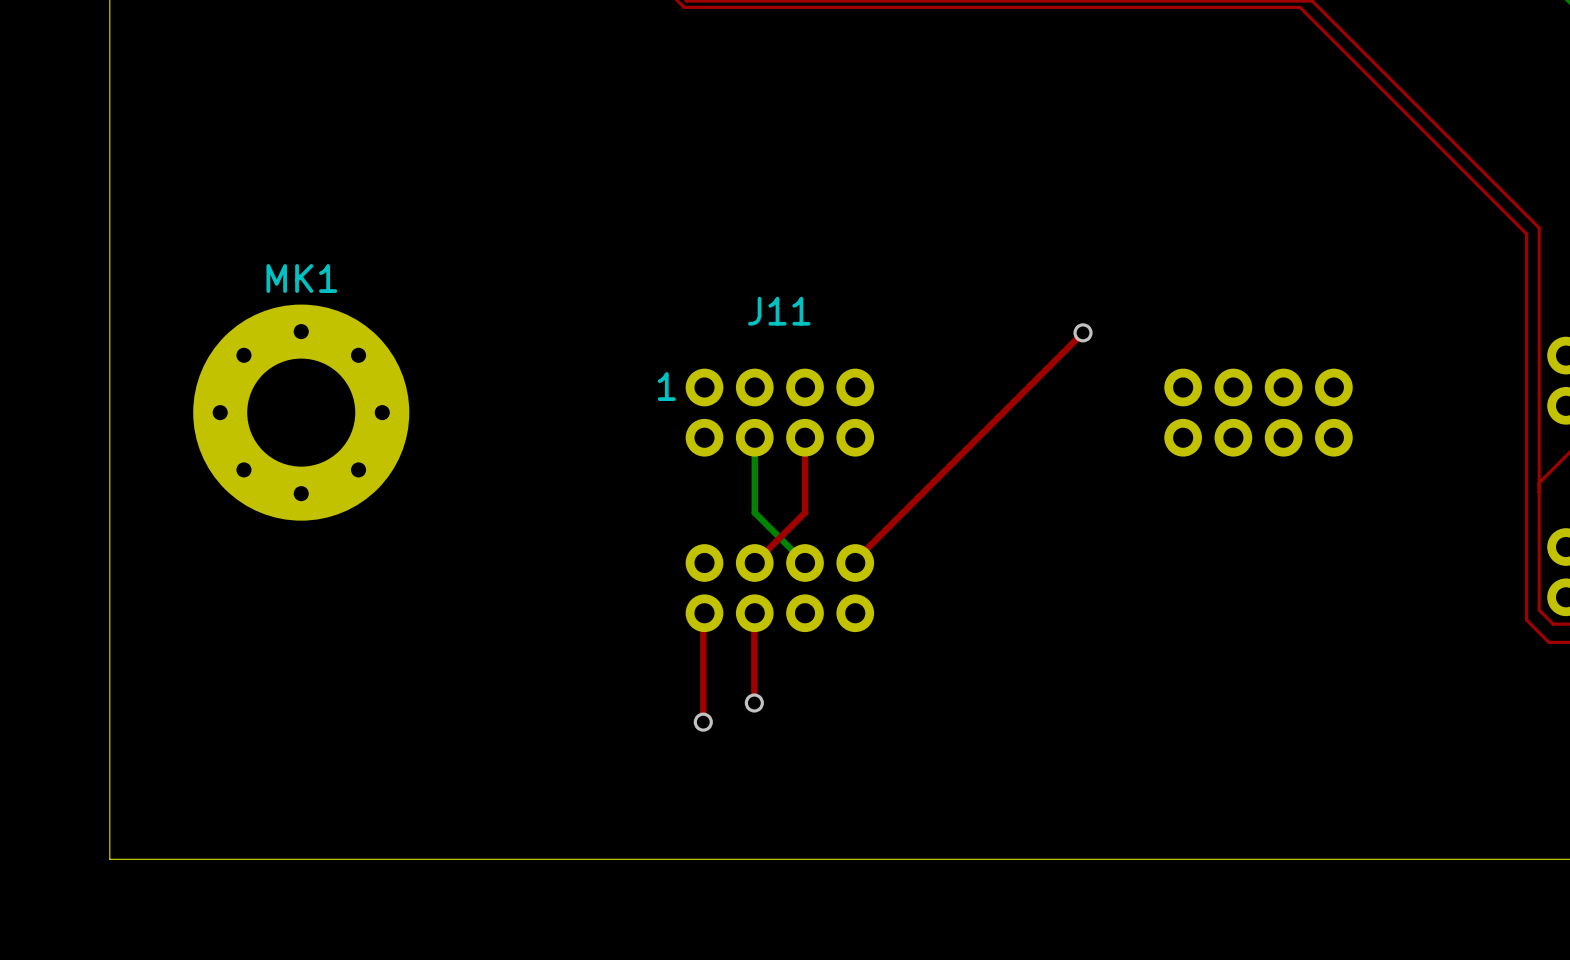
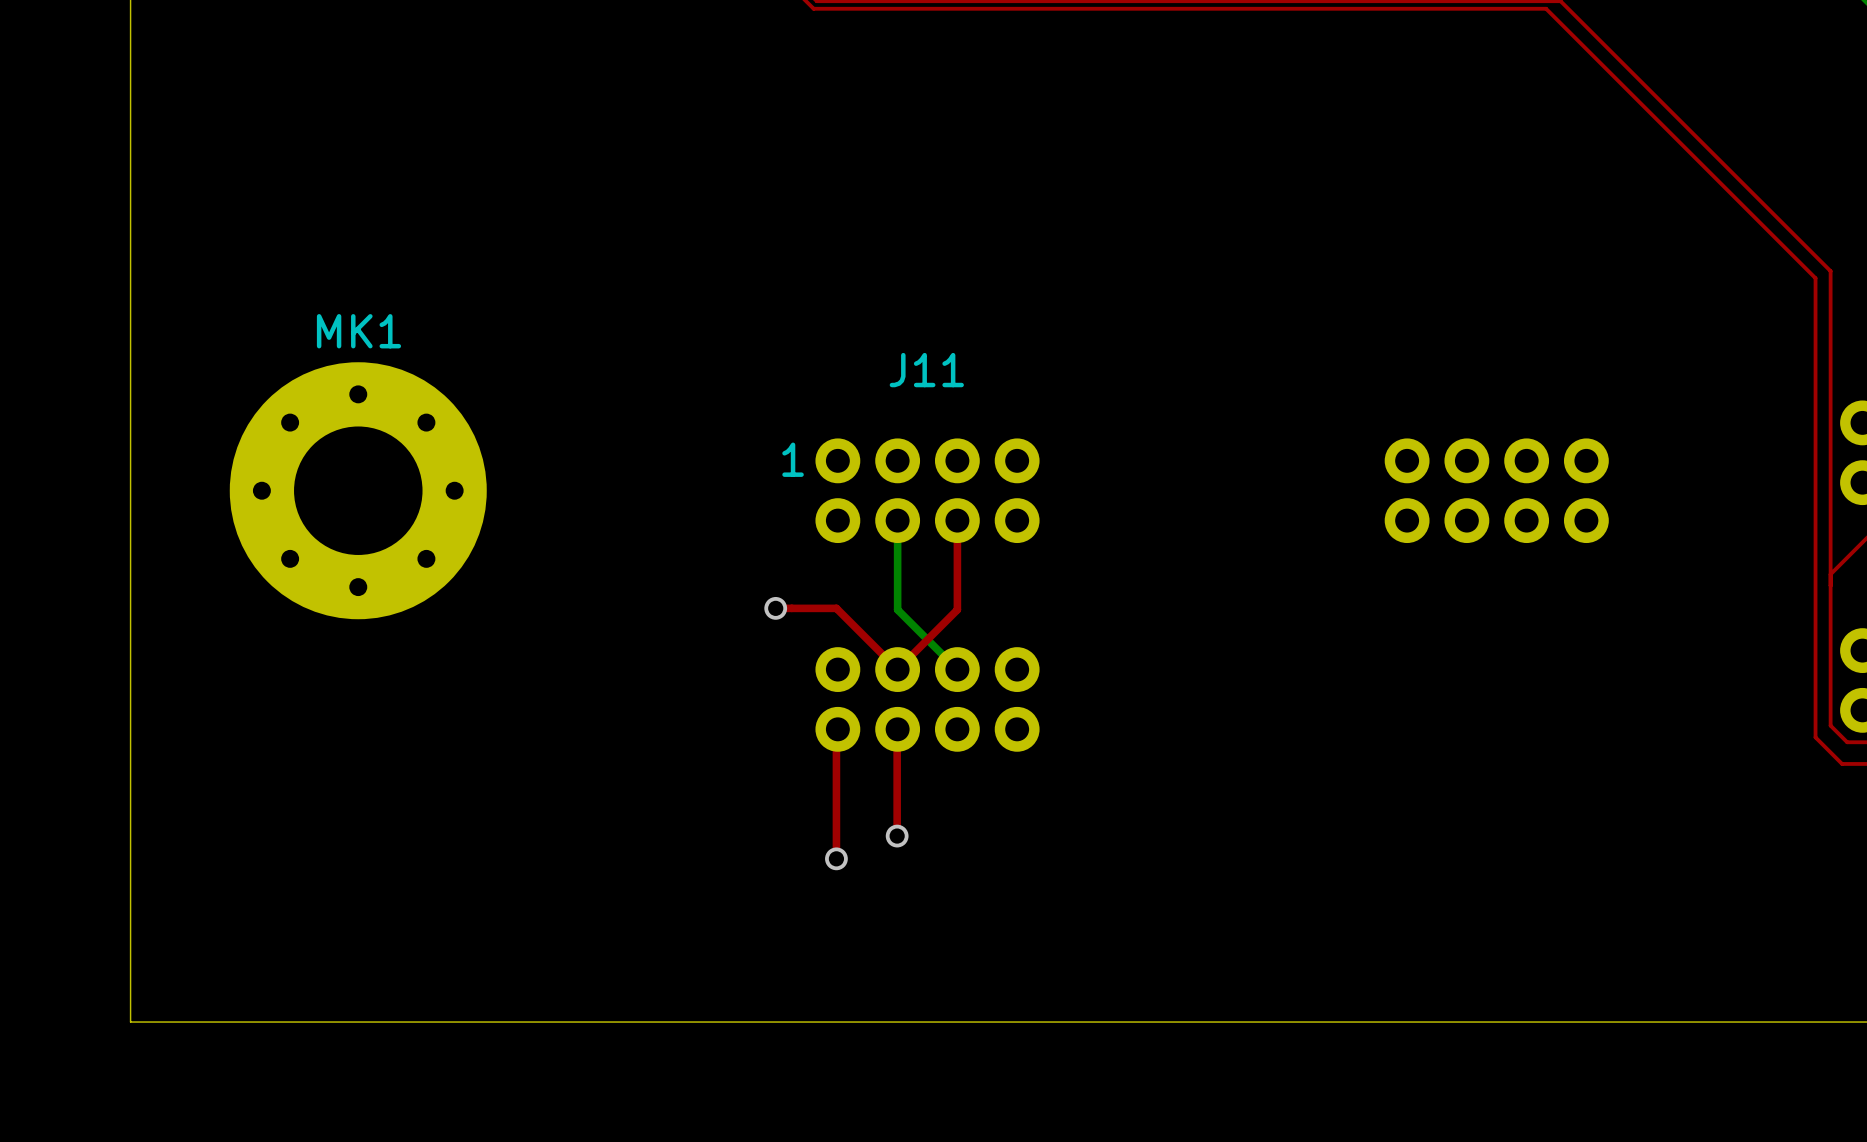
top track: (1083, 332) (855, 560) (855, 562) -> none
via: (1083, 332) -> none
top track: none -> (775, 608) (836, 608) (897, 669)
via: none -> (775, 608)

